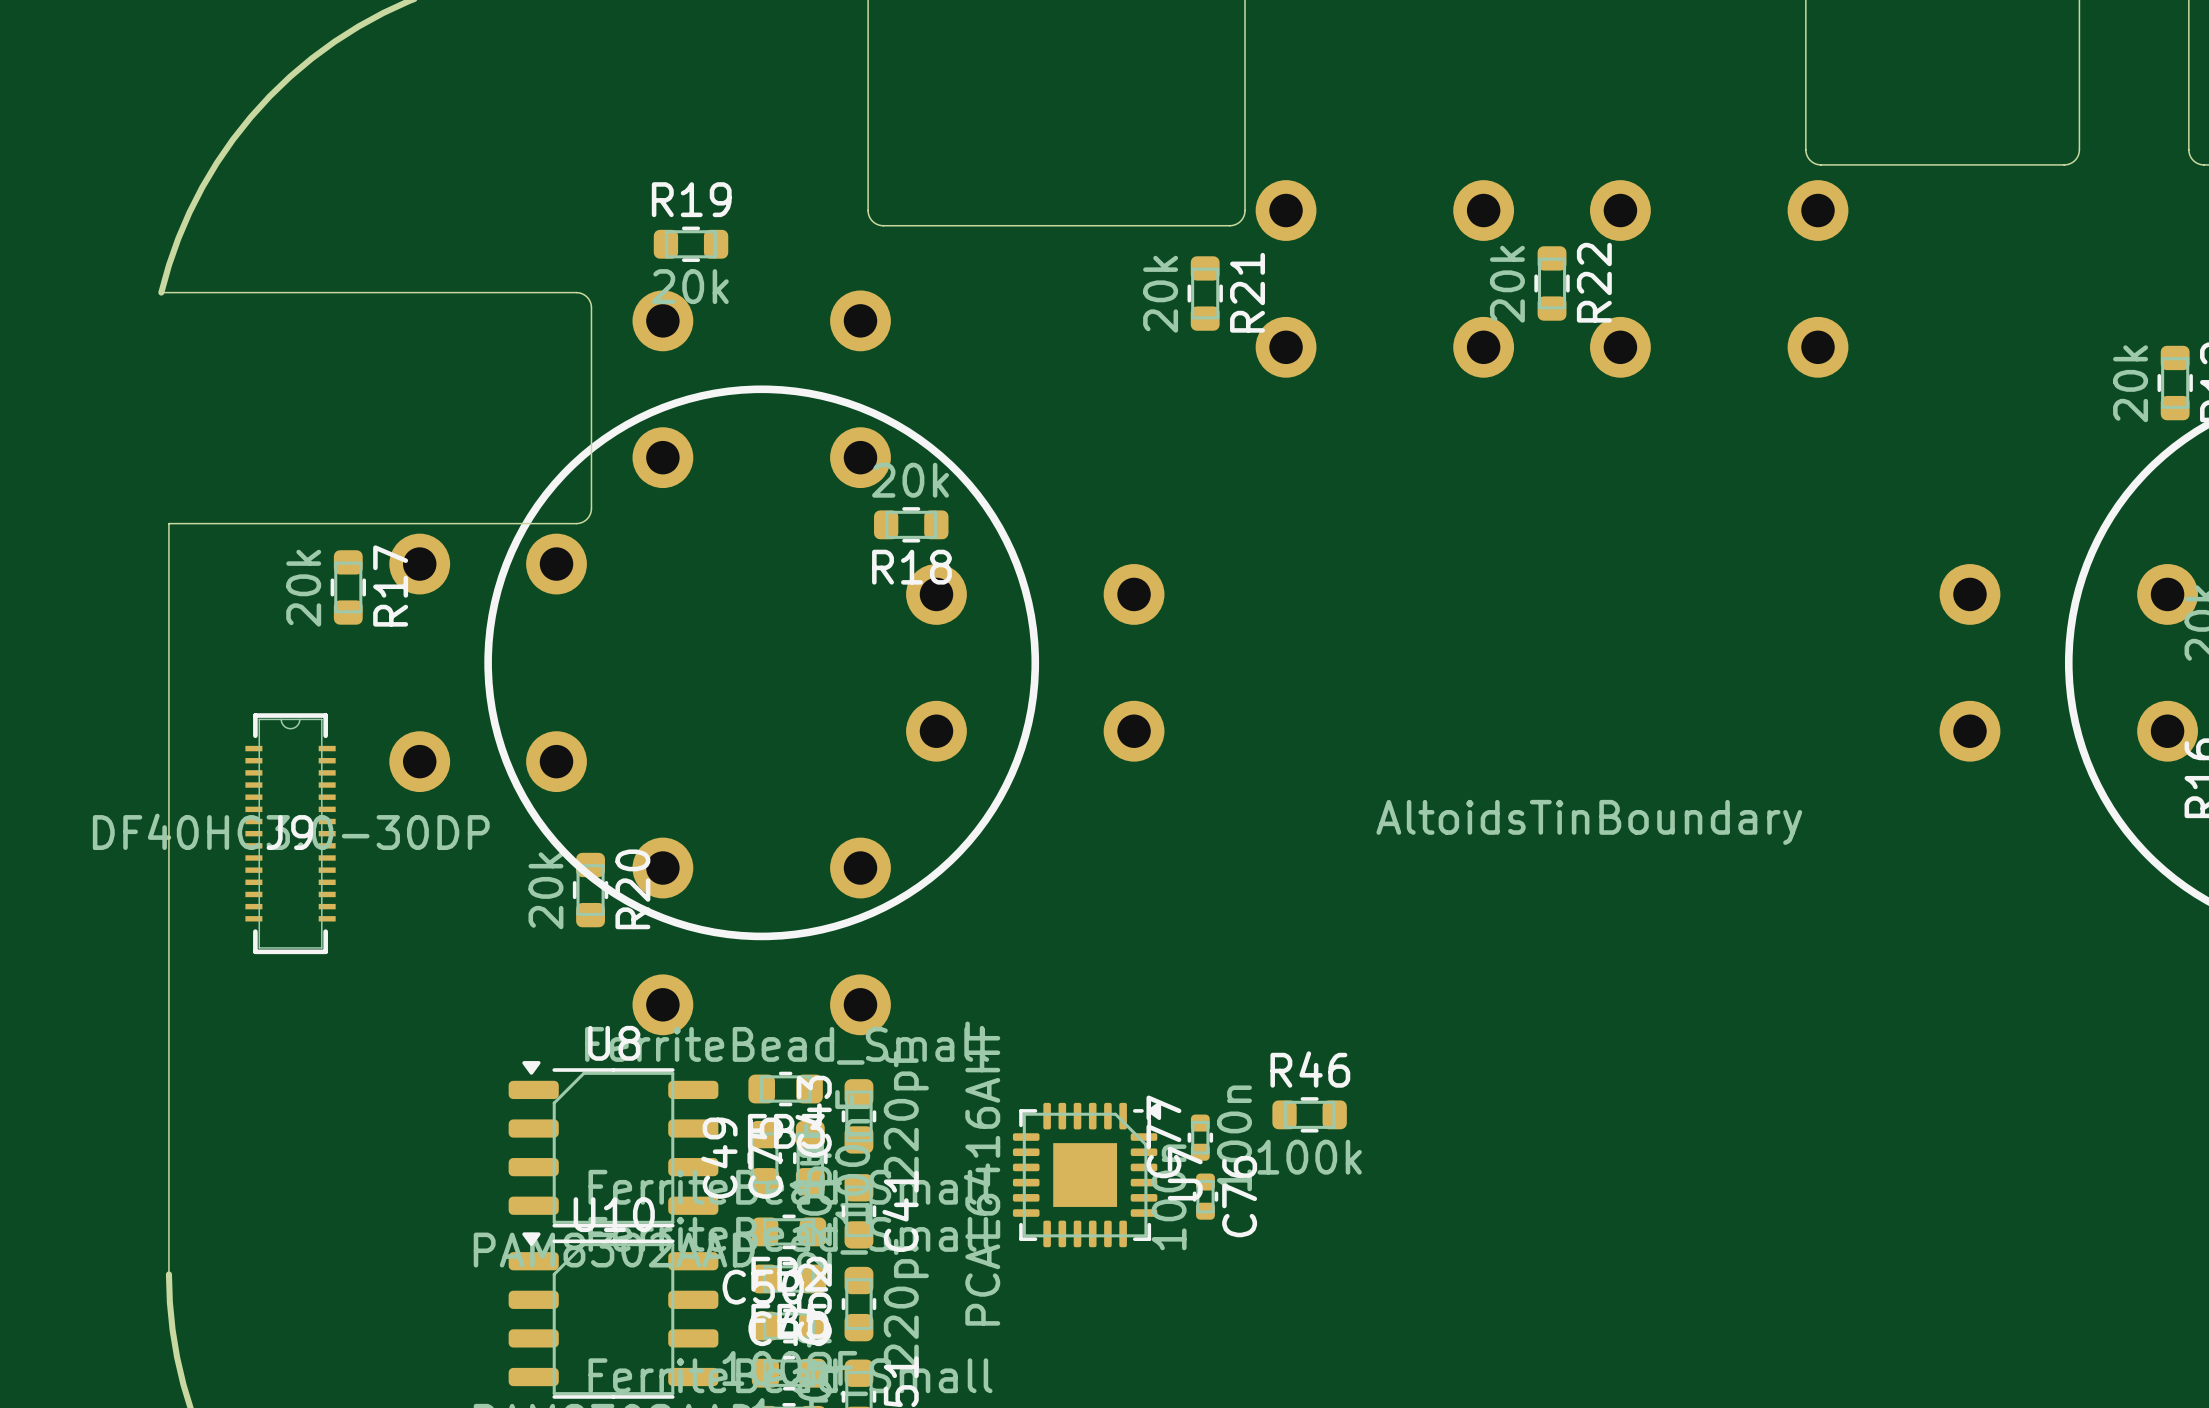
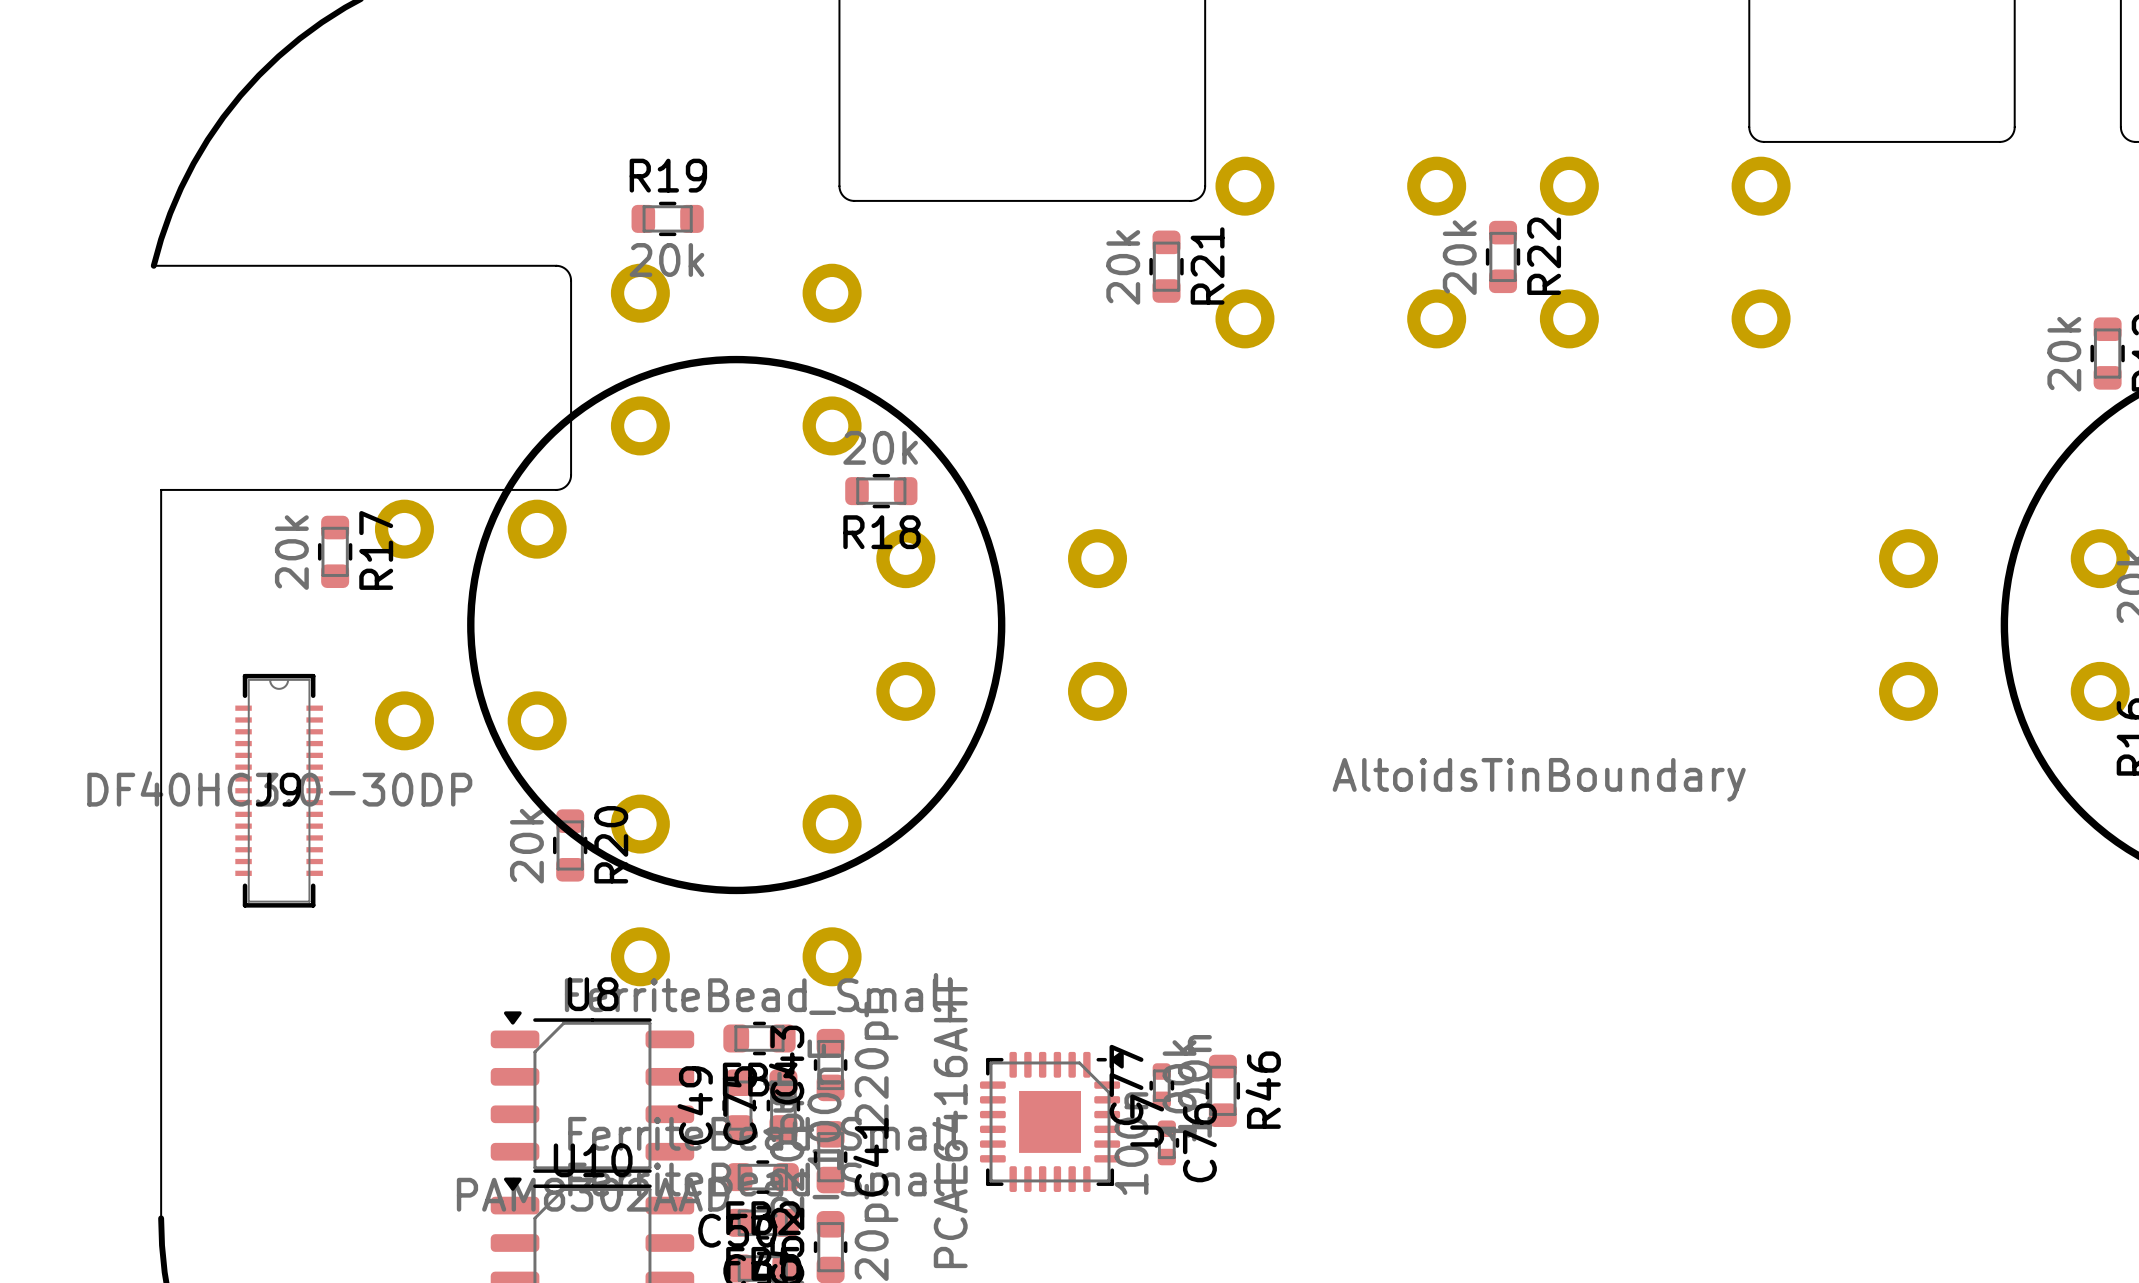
R46 rotation: 0° (1309, 1114) -> 90° clockwise (1222, 1090)
R46 position: (1309, 1114) -> (1222, 1090)

